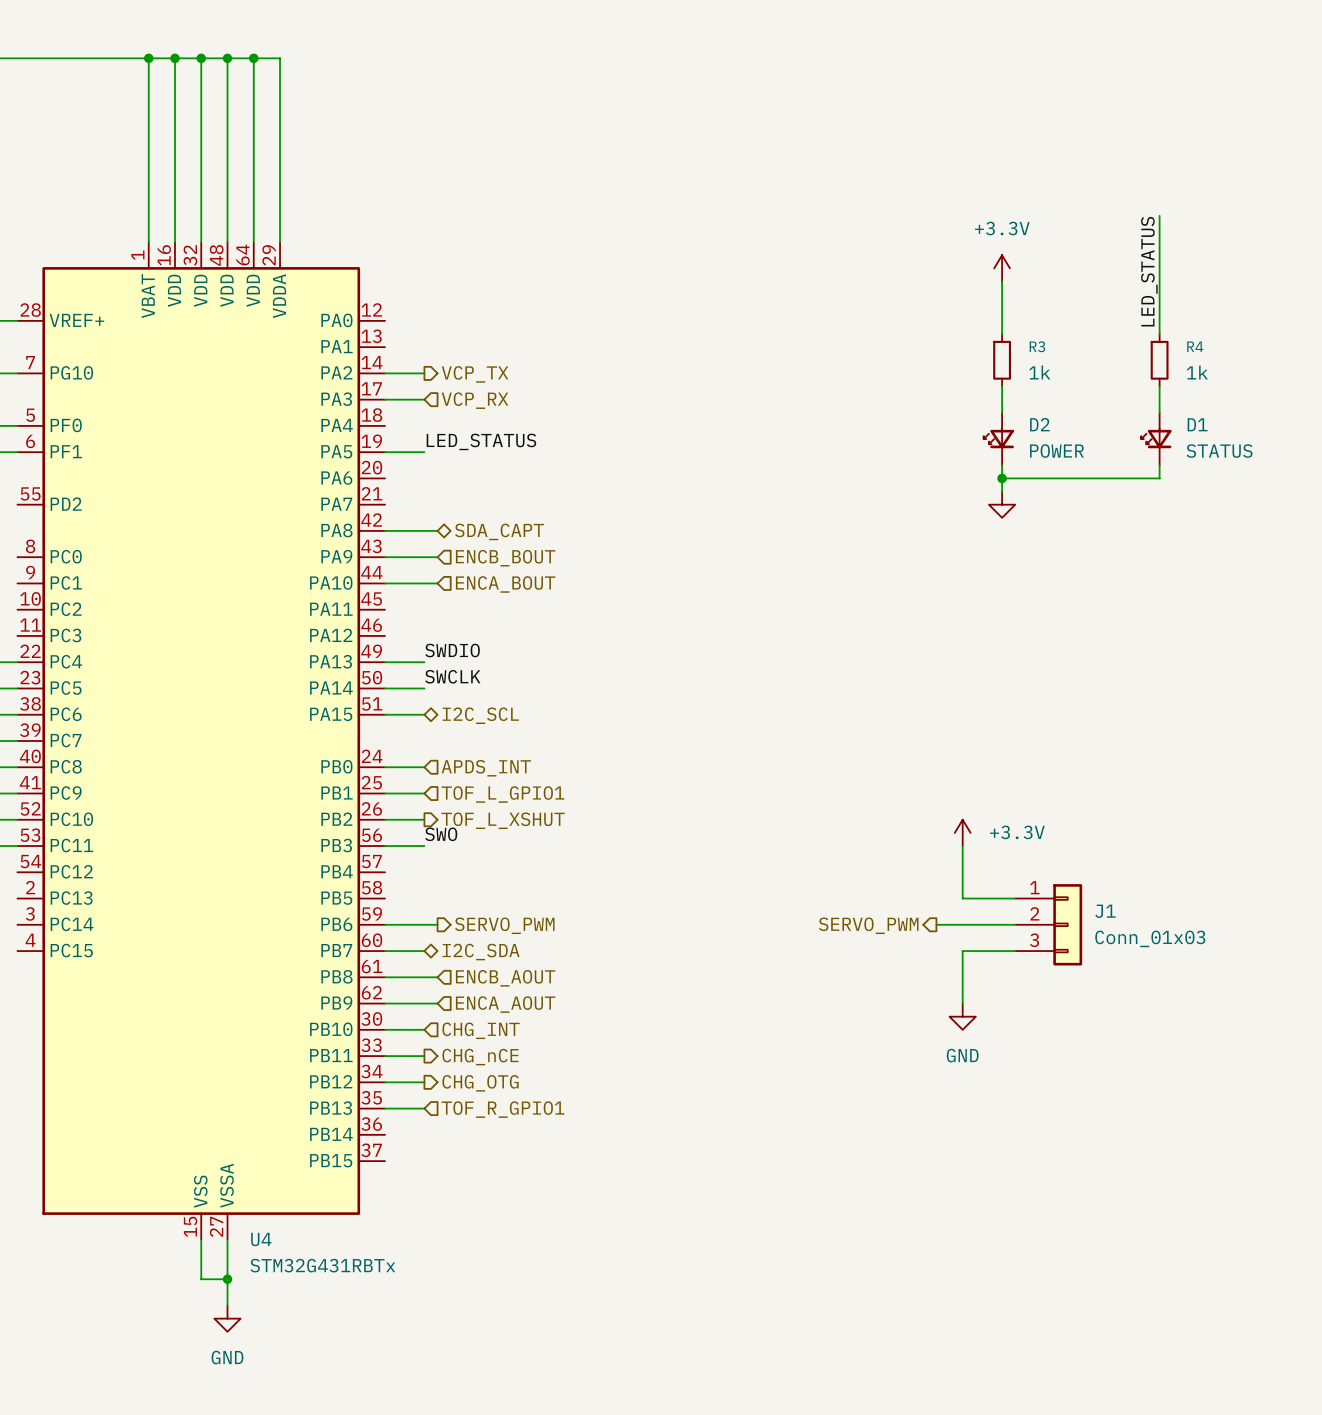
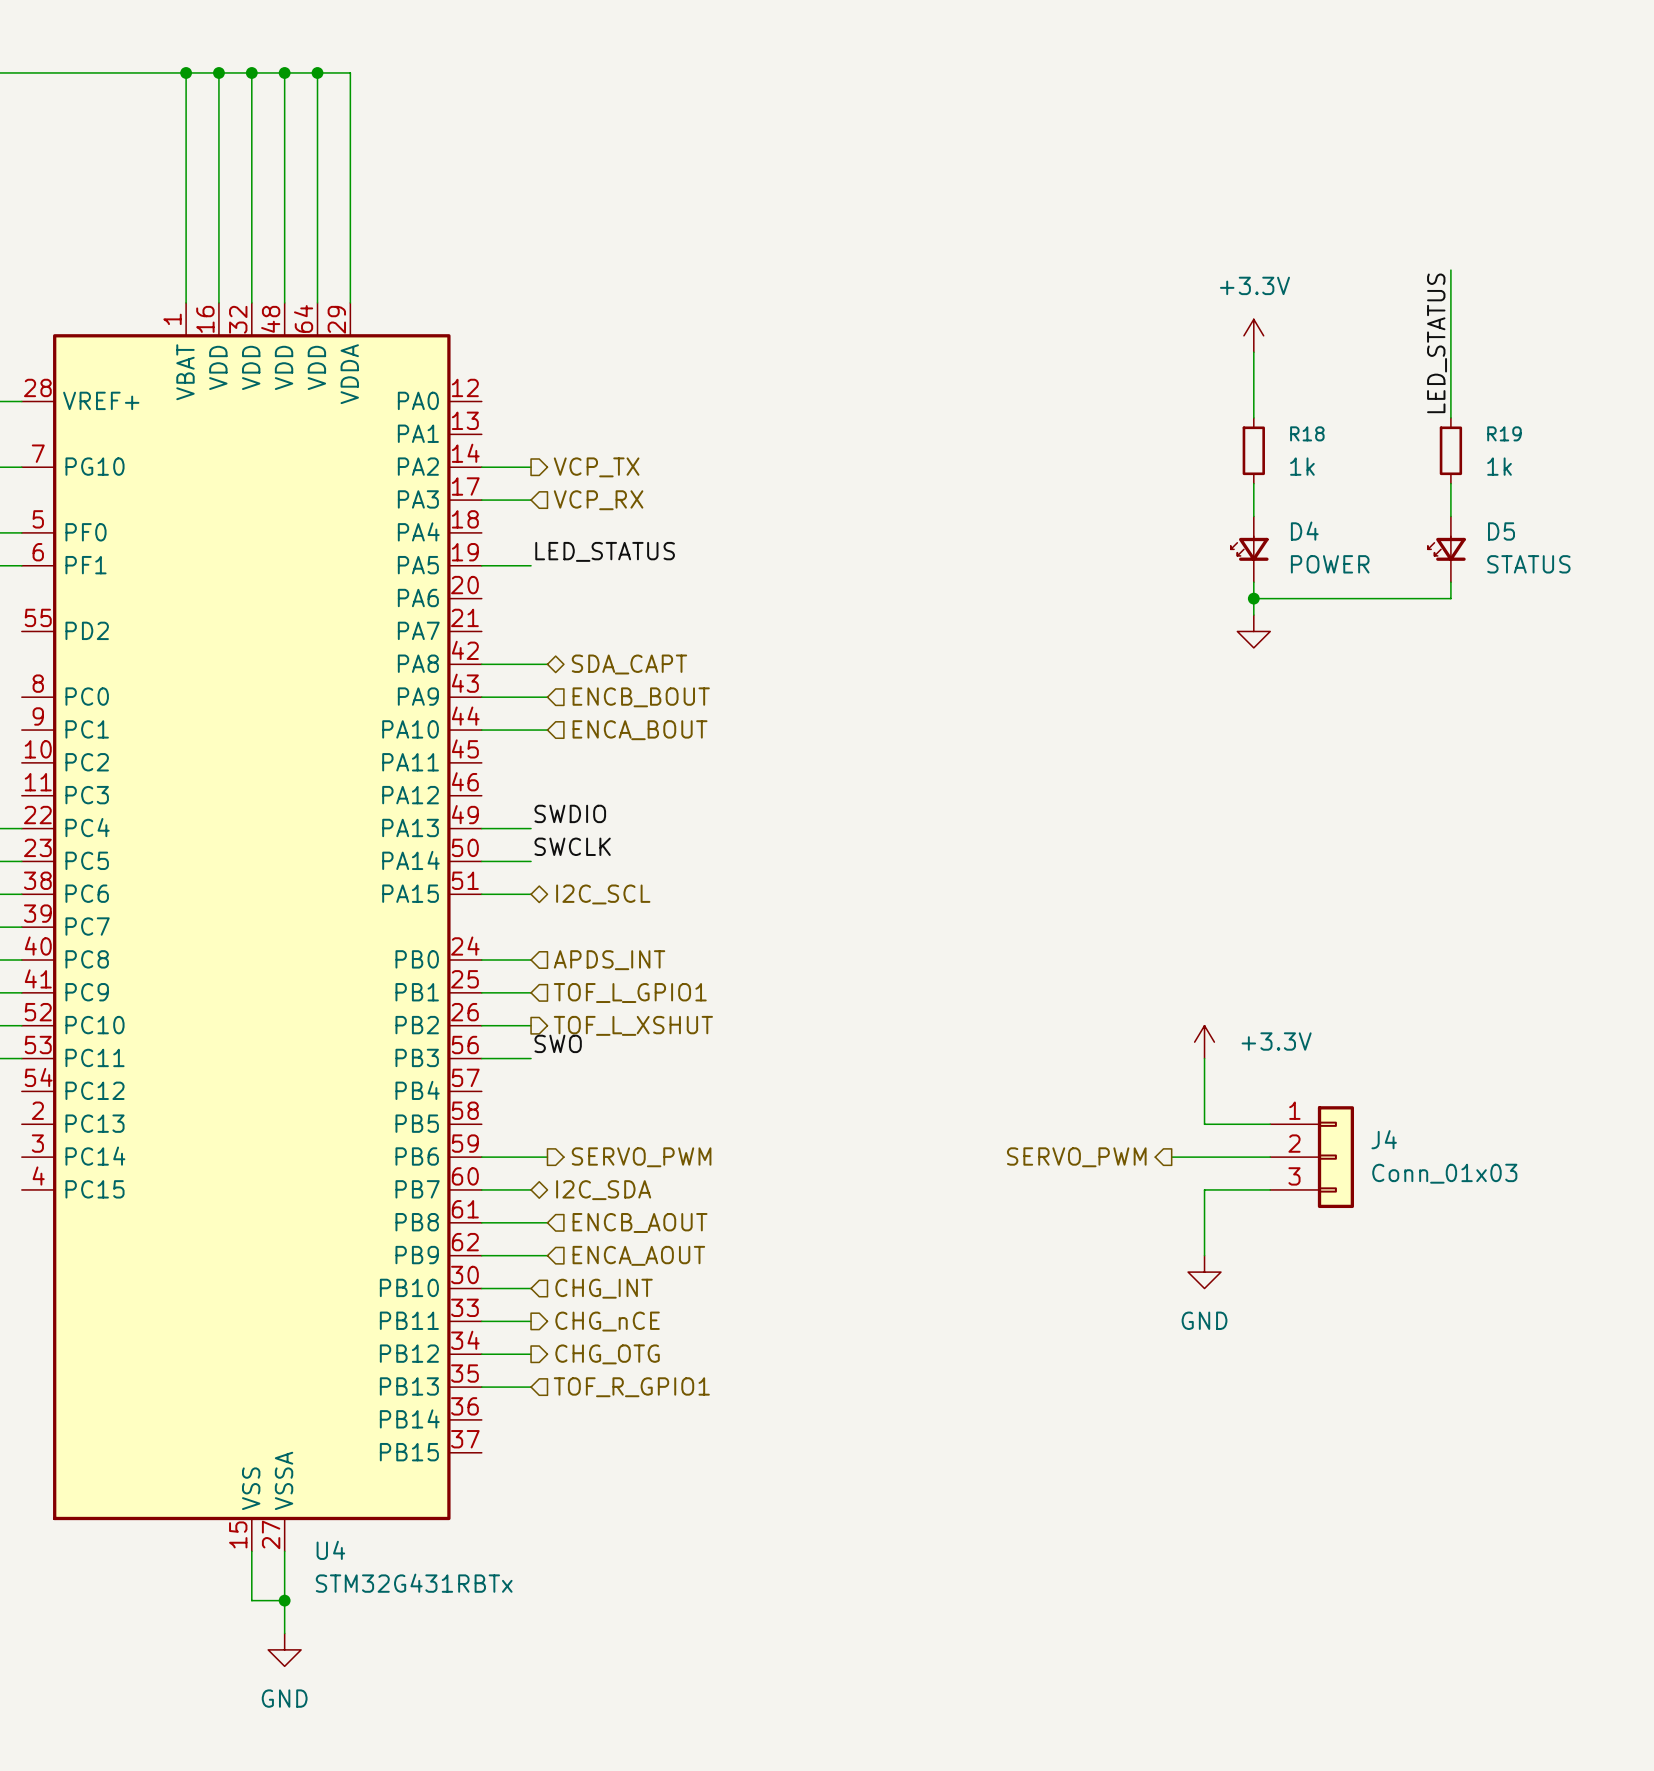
R3 name: R3 (1037, 346) -> R18 (1307, 433)
R4 name: R4 (1195, 346) -> R19 (1504, 433)
D2 name: D2 (1039, 424) -> D4 (1304, 531)
D1 name: D1 (1197, 424) -> D5 (1501, 531)
J1 name: J1 (1105, 911) -> J4 (1384, 1139)

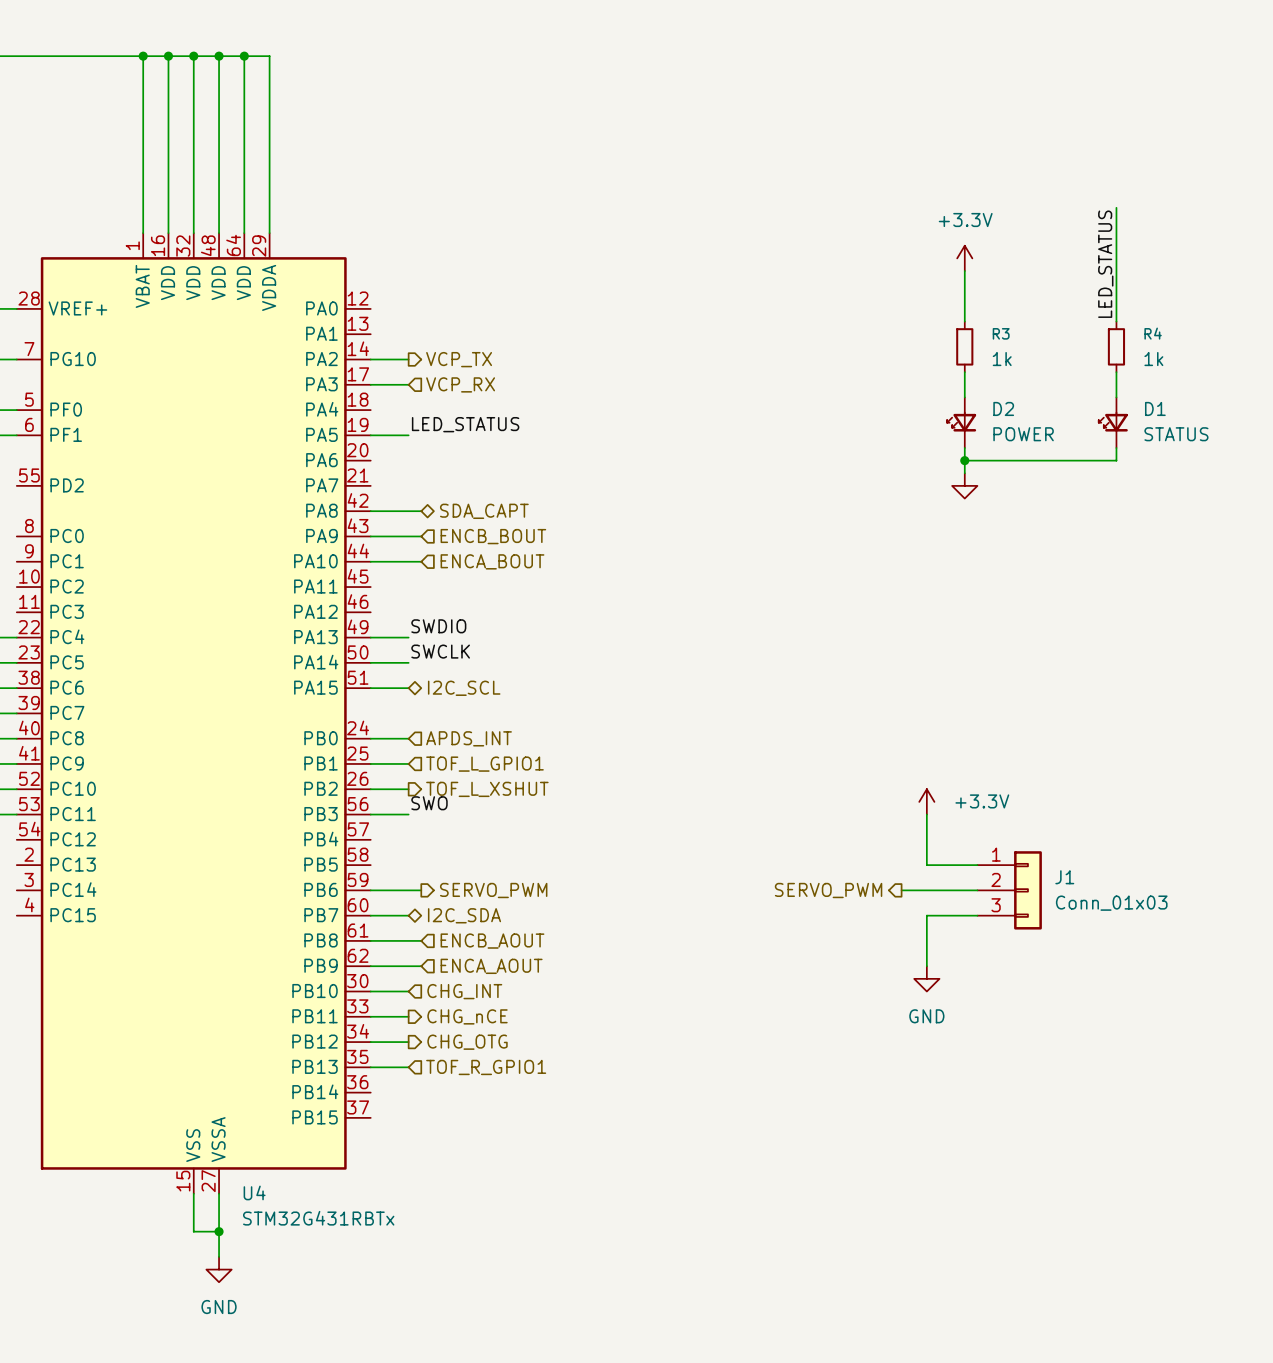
R18 name: R18 (1307, 433) -> R3 (1001, 333)
R19 name: R19 (1504, 433) -> R4 (1153, 333)
D4 name: D4 (1304, 531) -> D2 (1003, 408)
D5 name: D5 (1501, 531) -> D1 (1155, 408)
J4 name: J4 (1384, 1139) -> J1 (1064, 877)

